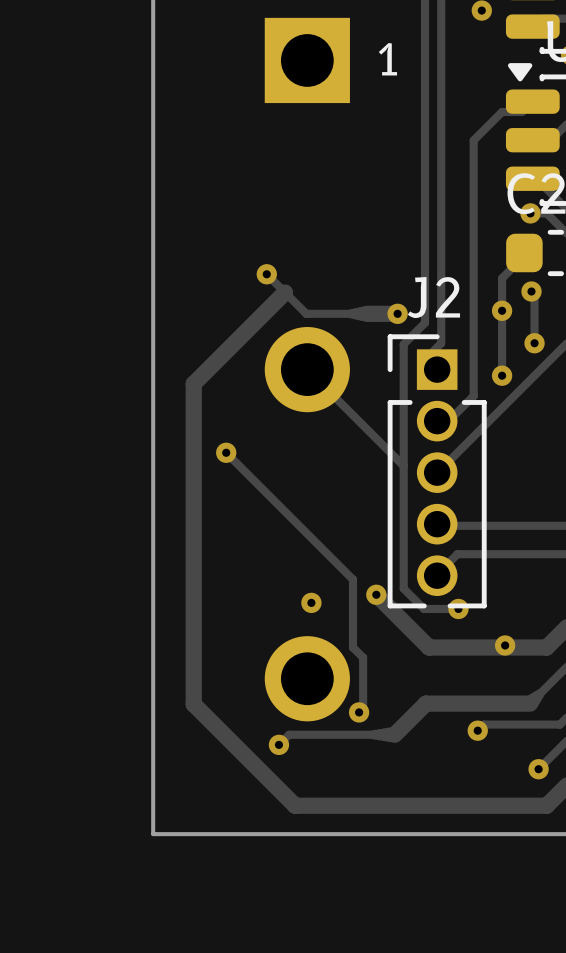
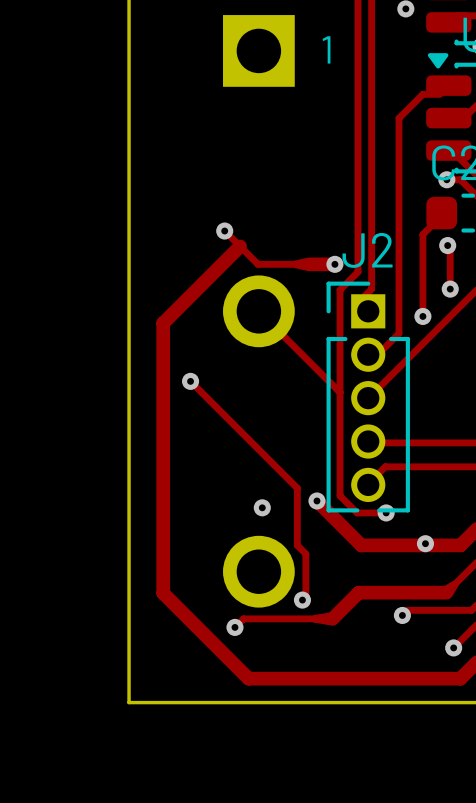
via: (502, 310) -> none

